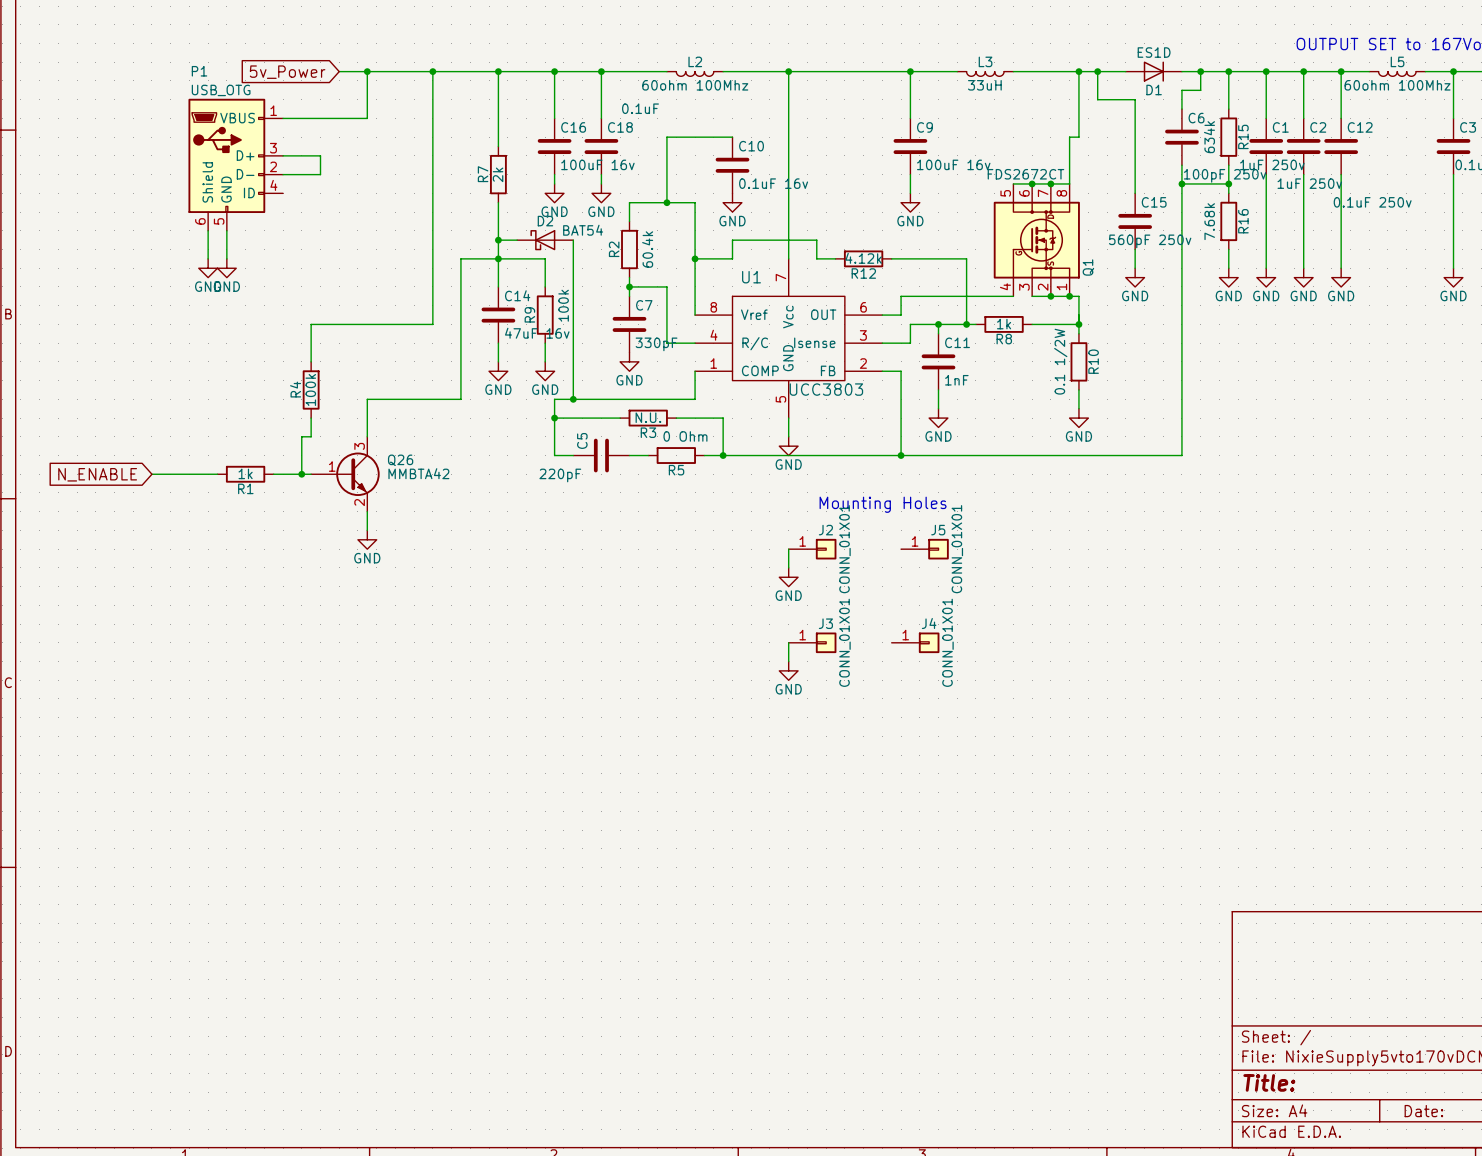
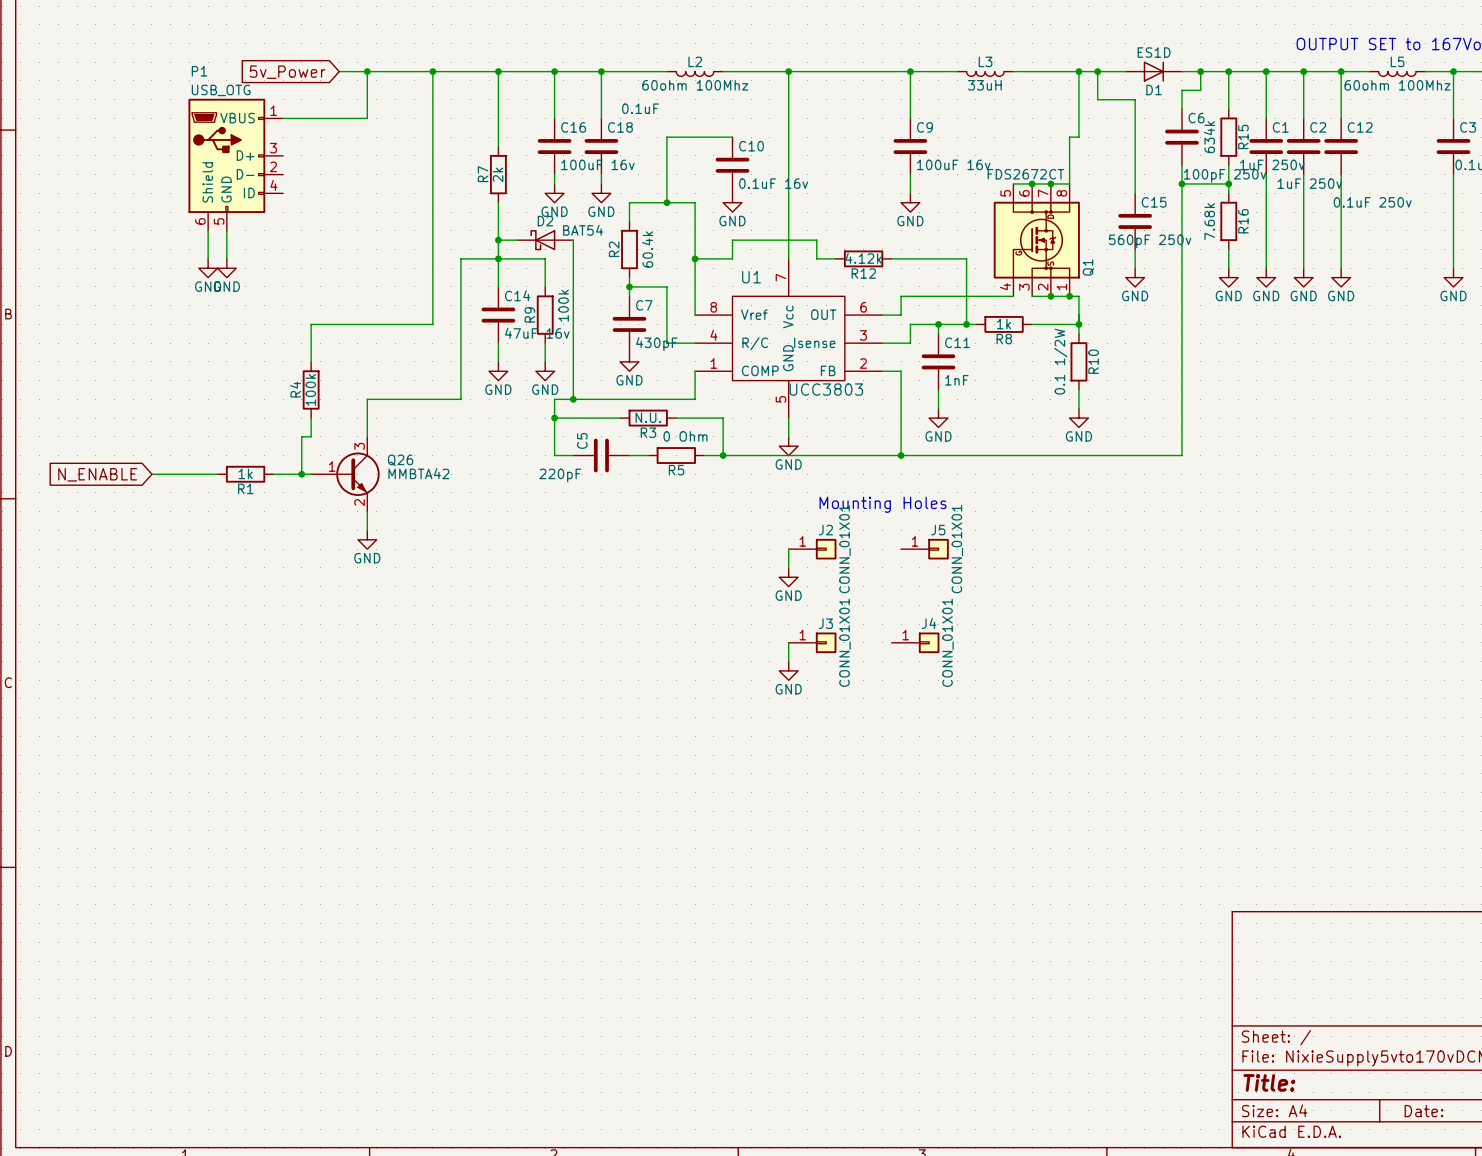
wire: (283, 155) (320, 155) (320, 174) (283, 174) -> none
C7 value: 330pF (656, 344) -> 430pF (656, 344)

